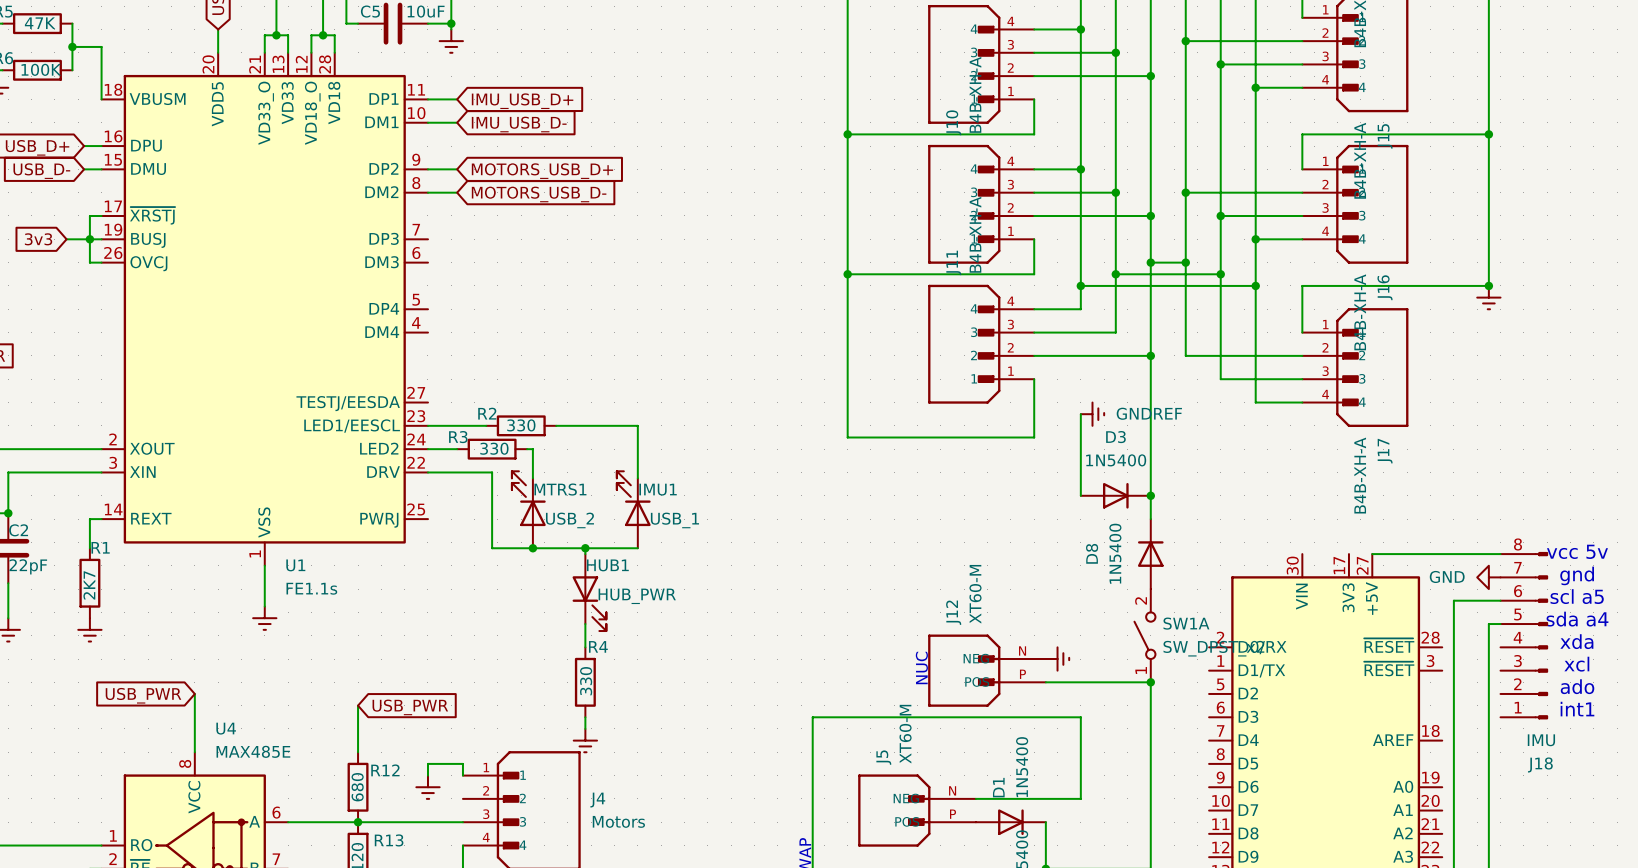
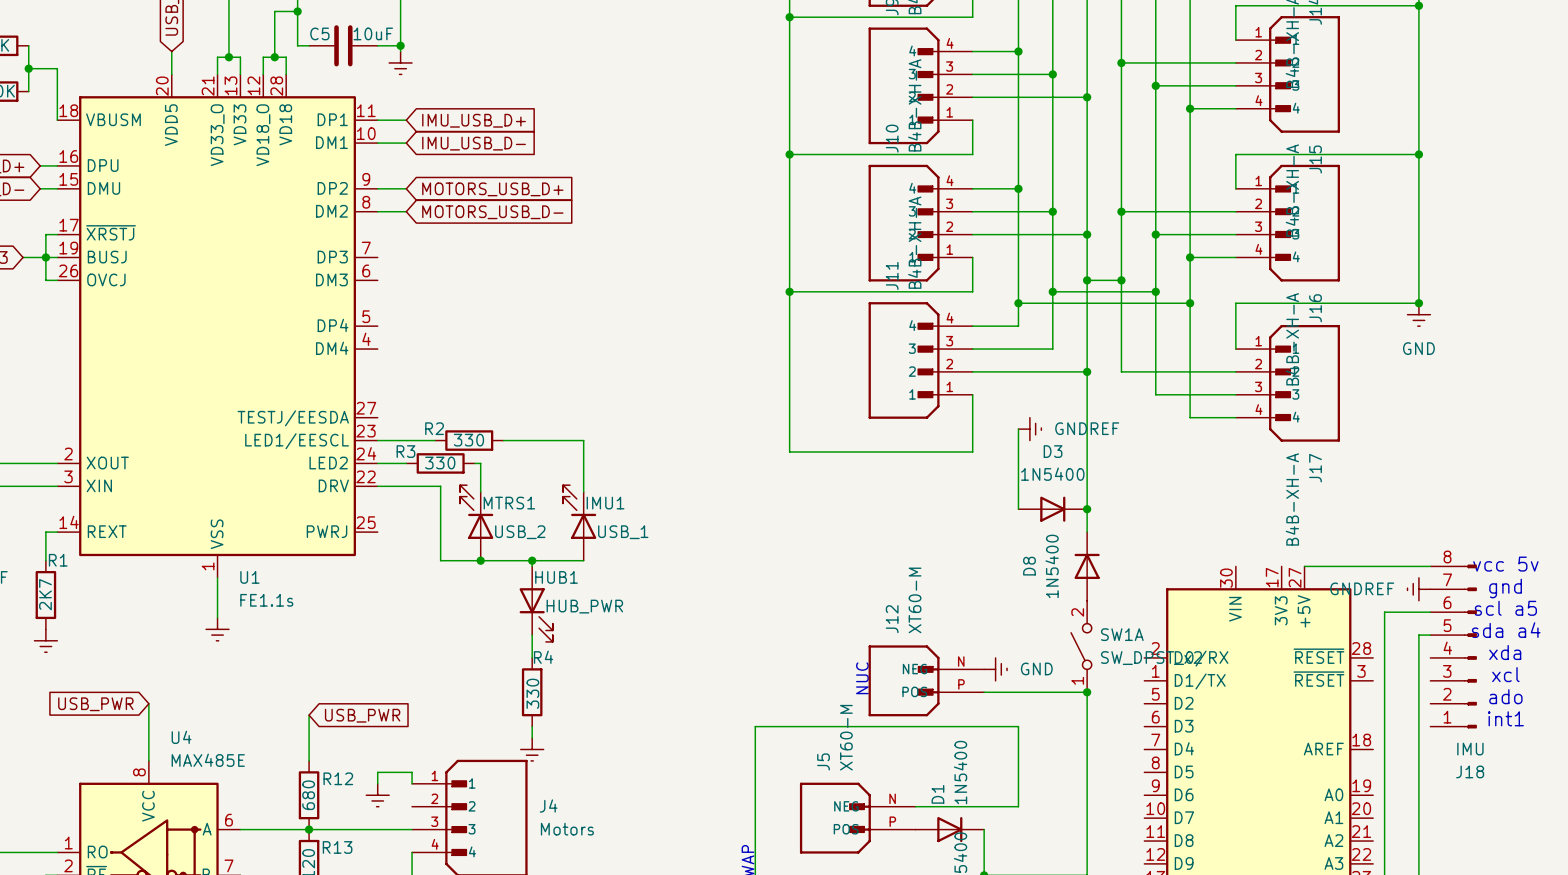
power symbol text: none -> GND (1418, 348)
power symbol: GND (1488, 577) -> GNDREF (1418, 589)
power symbol text: none -> GND (1036, 668)

